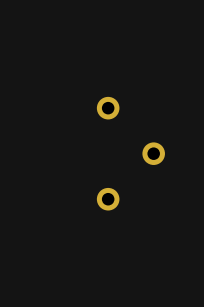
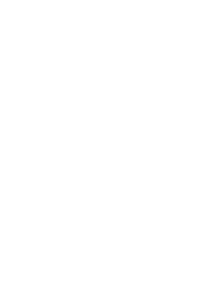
part: (130, 153) -> none

